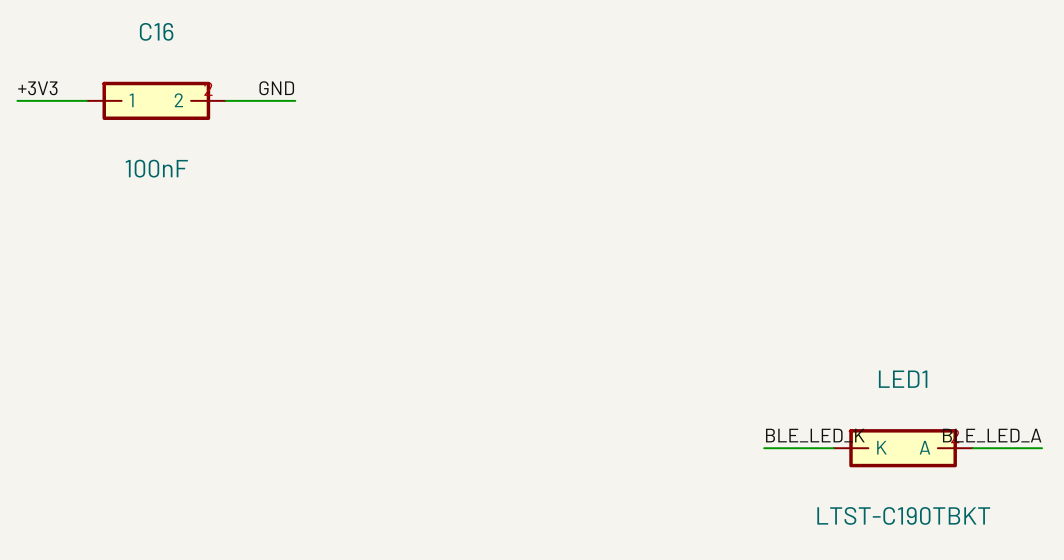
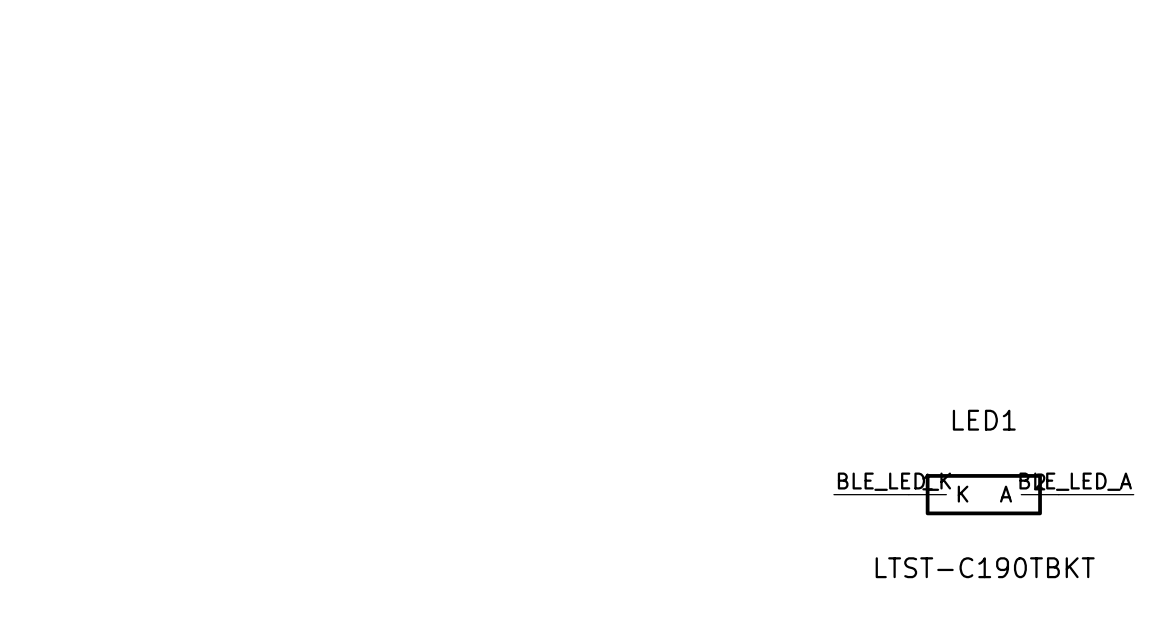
label: +3V3 (37, 88) -> none
label: GND (276, 88) -> none
wire: (17, 100) (86, 100) -> none
C16: 100nF (156, 100) -> none
wire: (225, 100) (295, 100) -> none

